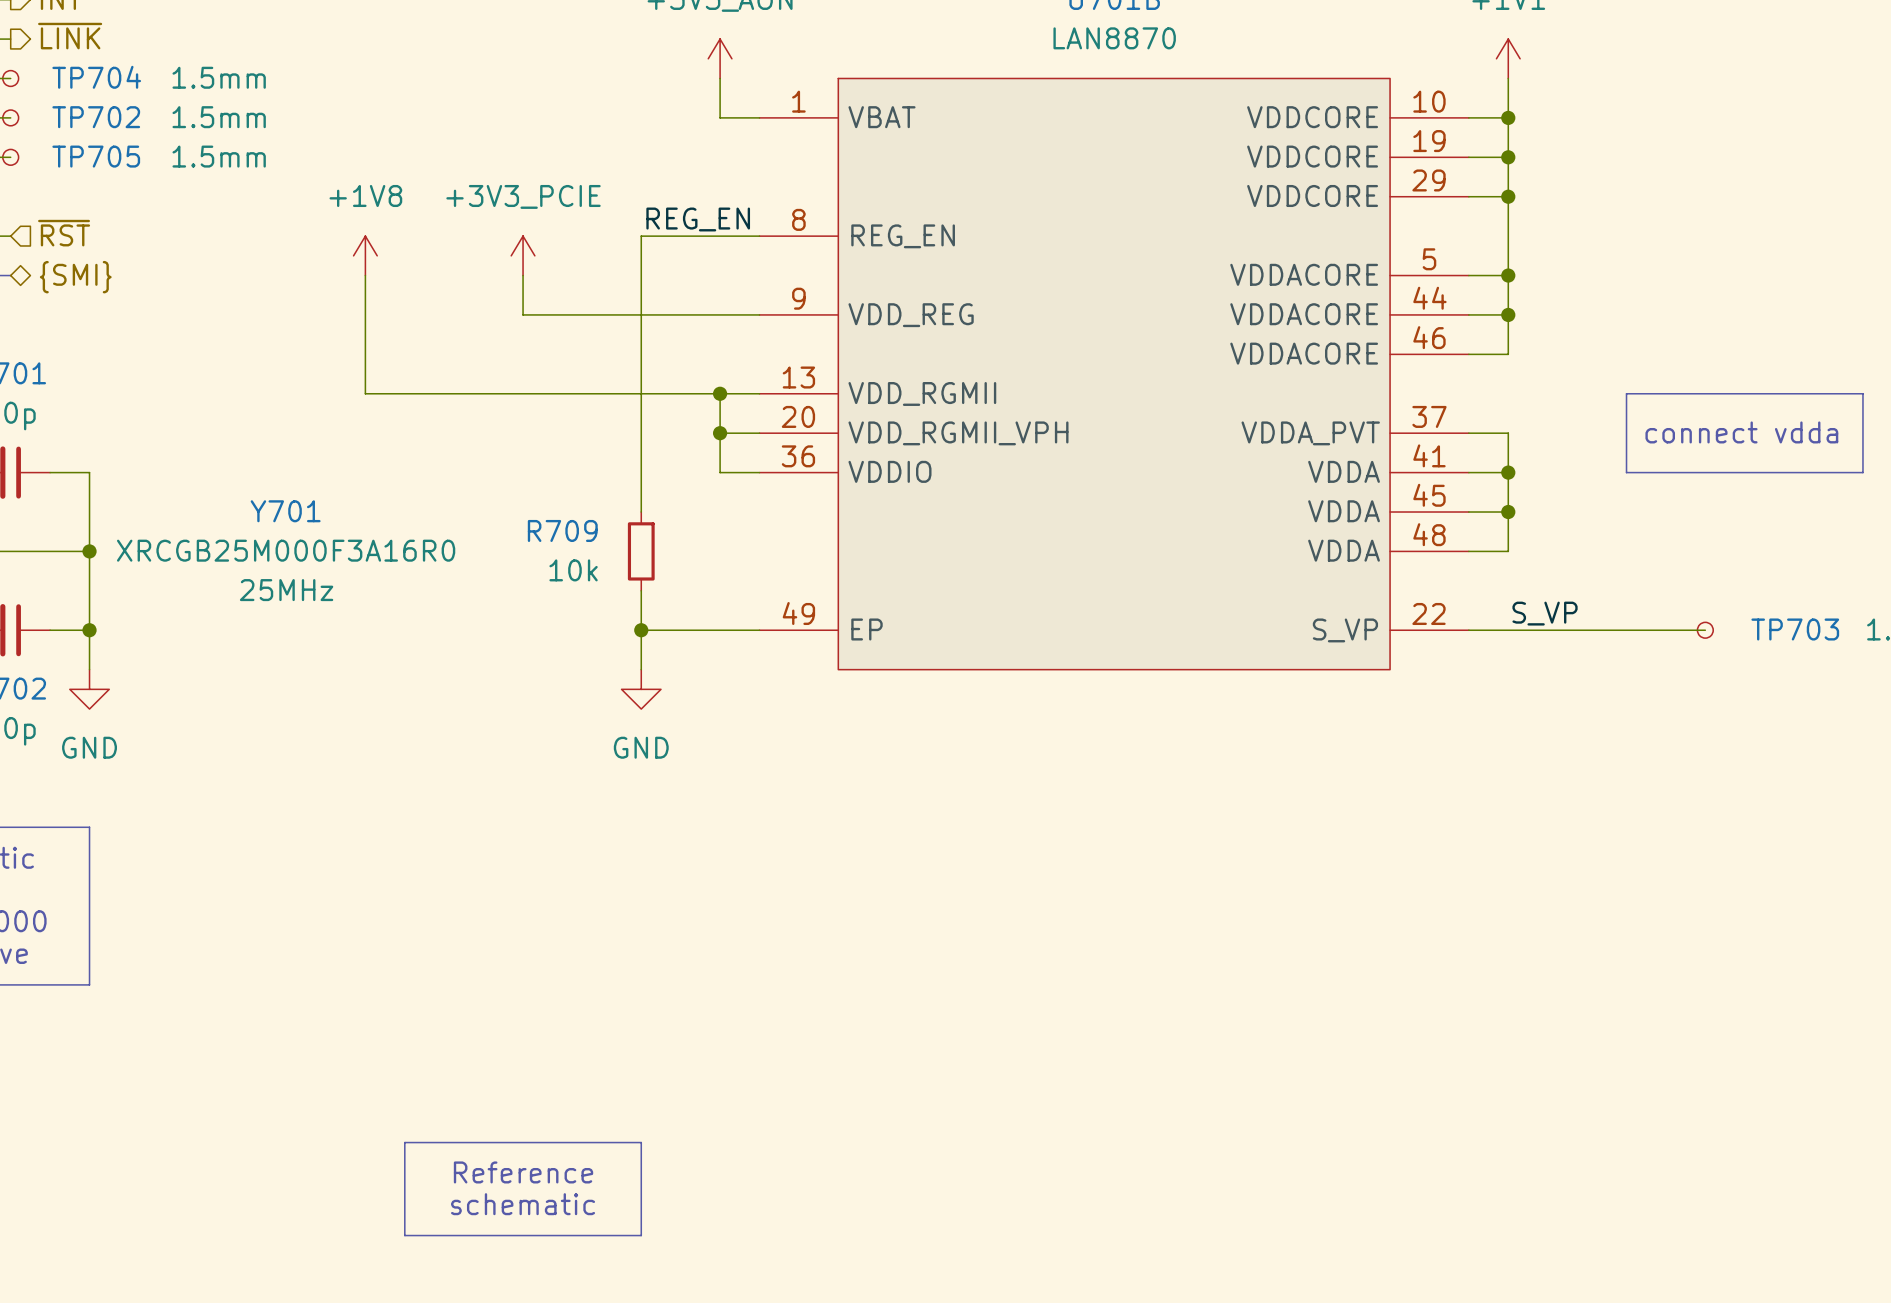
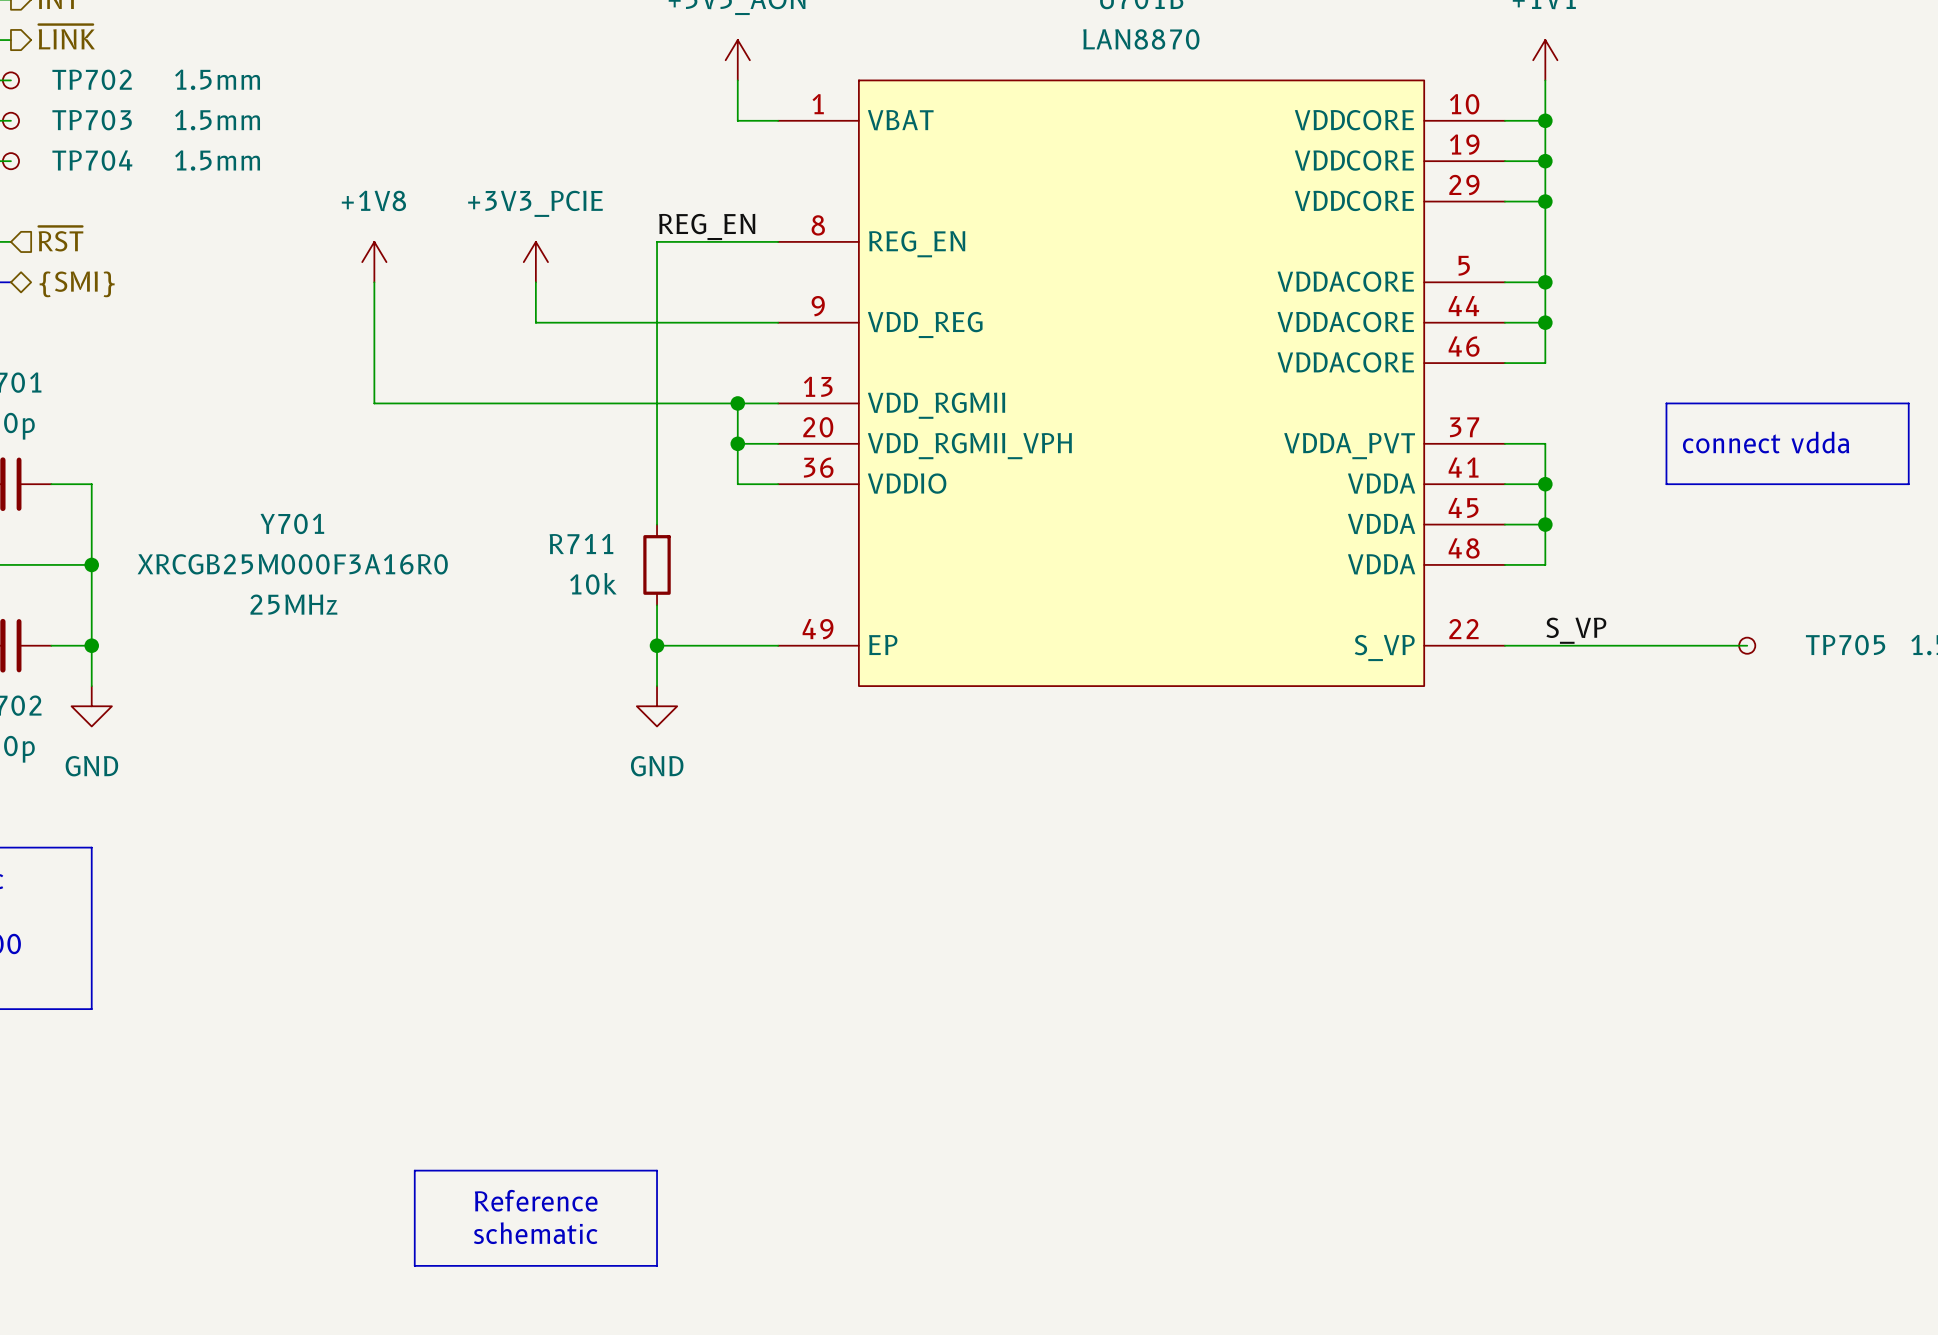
TP704 name: TP704 (96, 77) -> TP702 (92, 79)
TP702 name: TP702 (96, 117) -> TP703 (92, 120)
TP705 name: TP705 (96, 156) -> TP704 (92, 160)
R709 name: R709 (562, 530) -> R711 (581, 544)
TP703 name: TP703 (1795, 629) -> TP705 (1845, 645)

